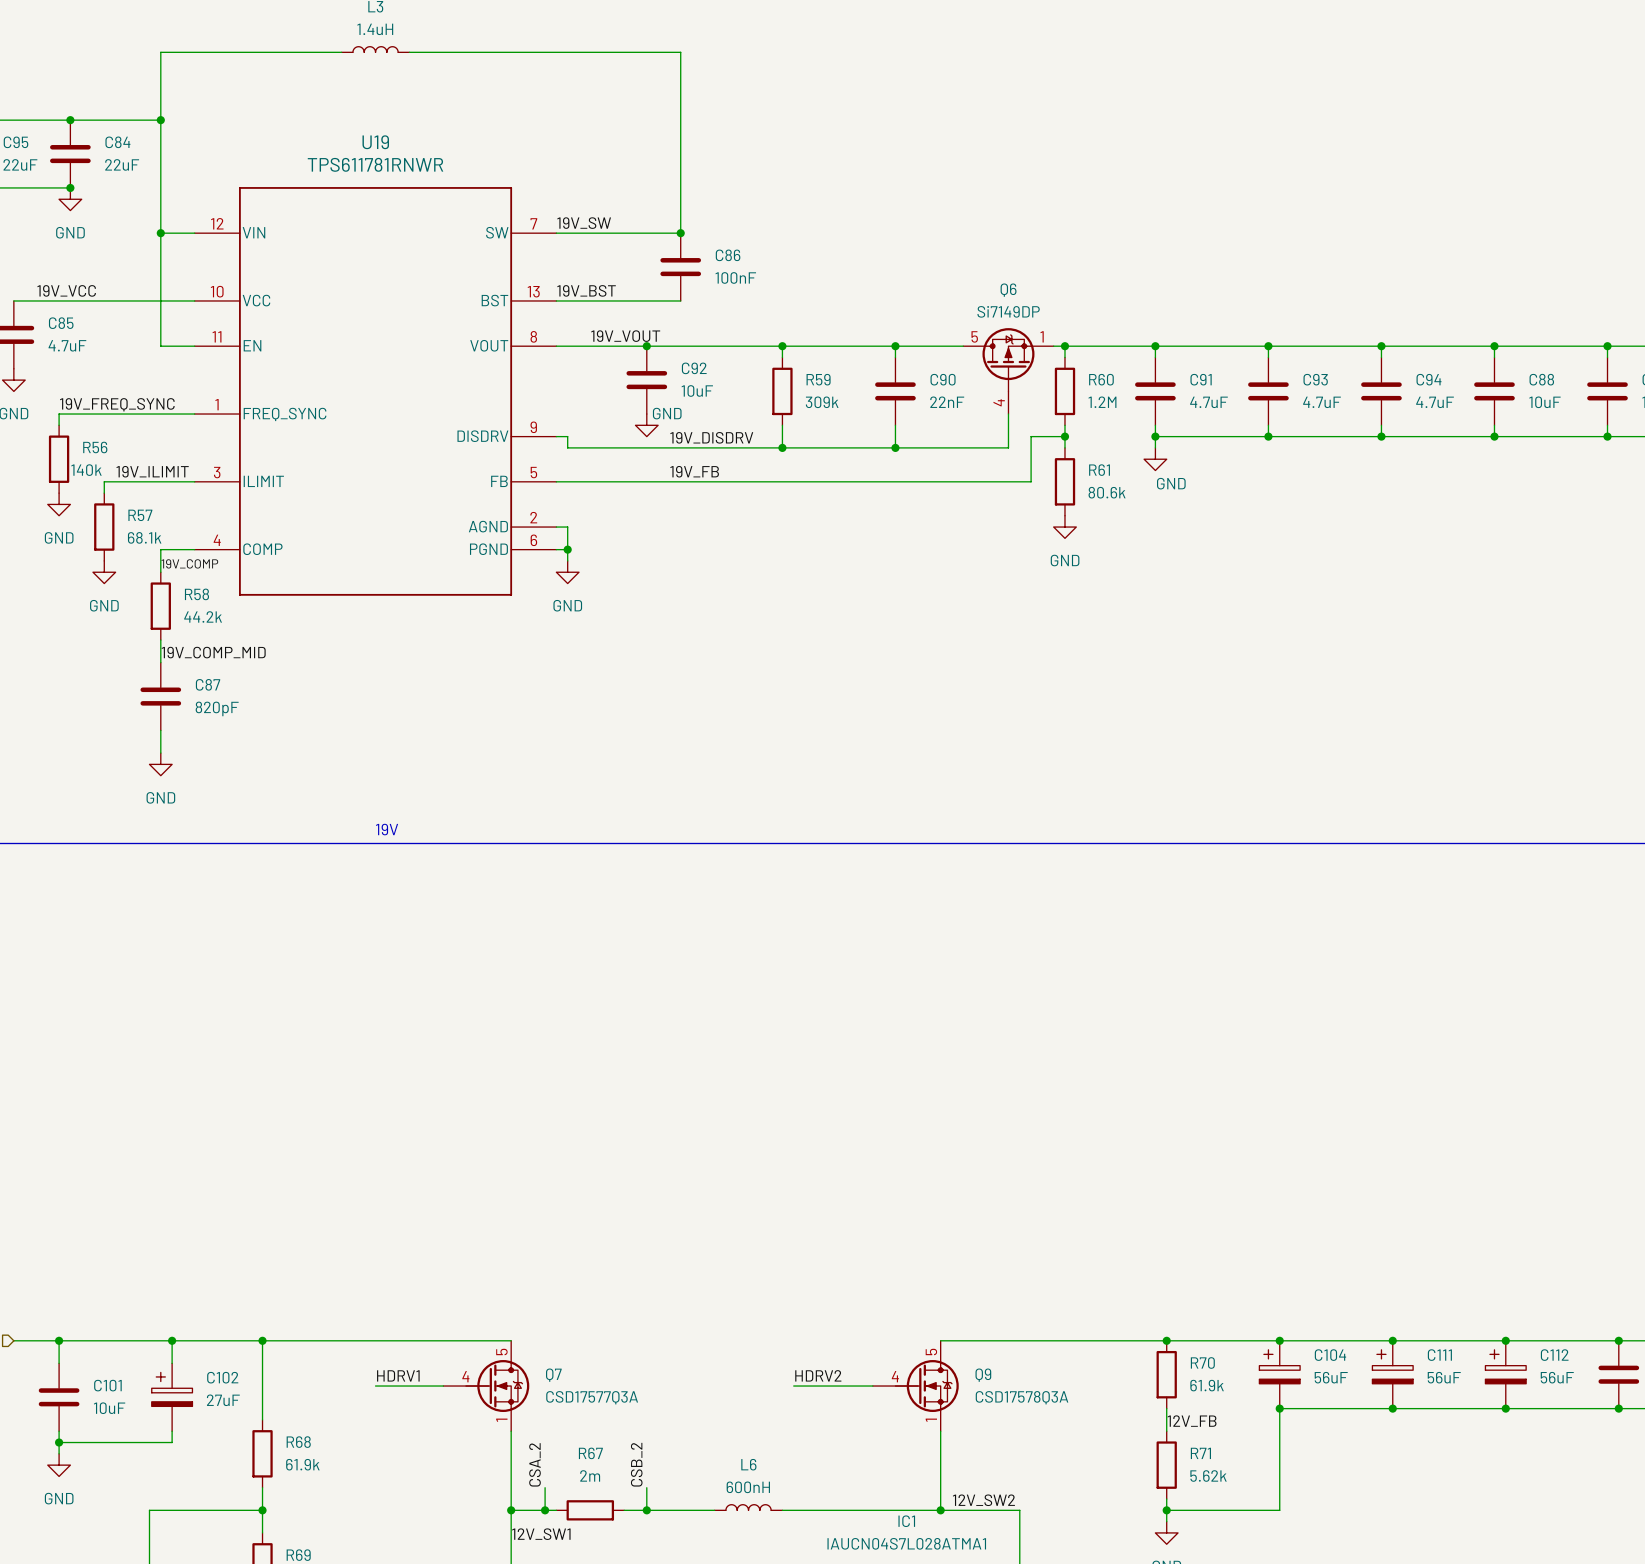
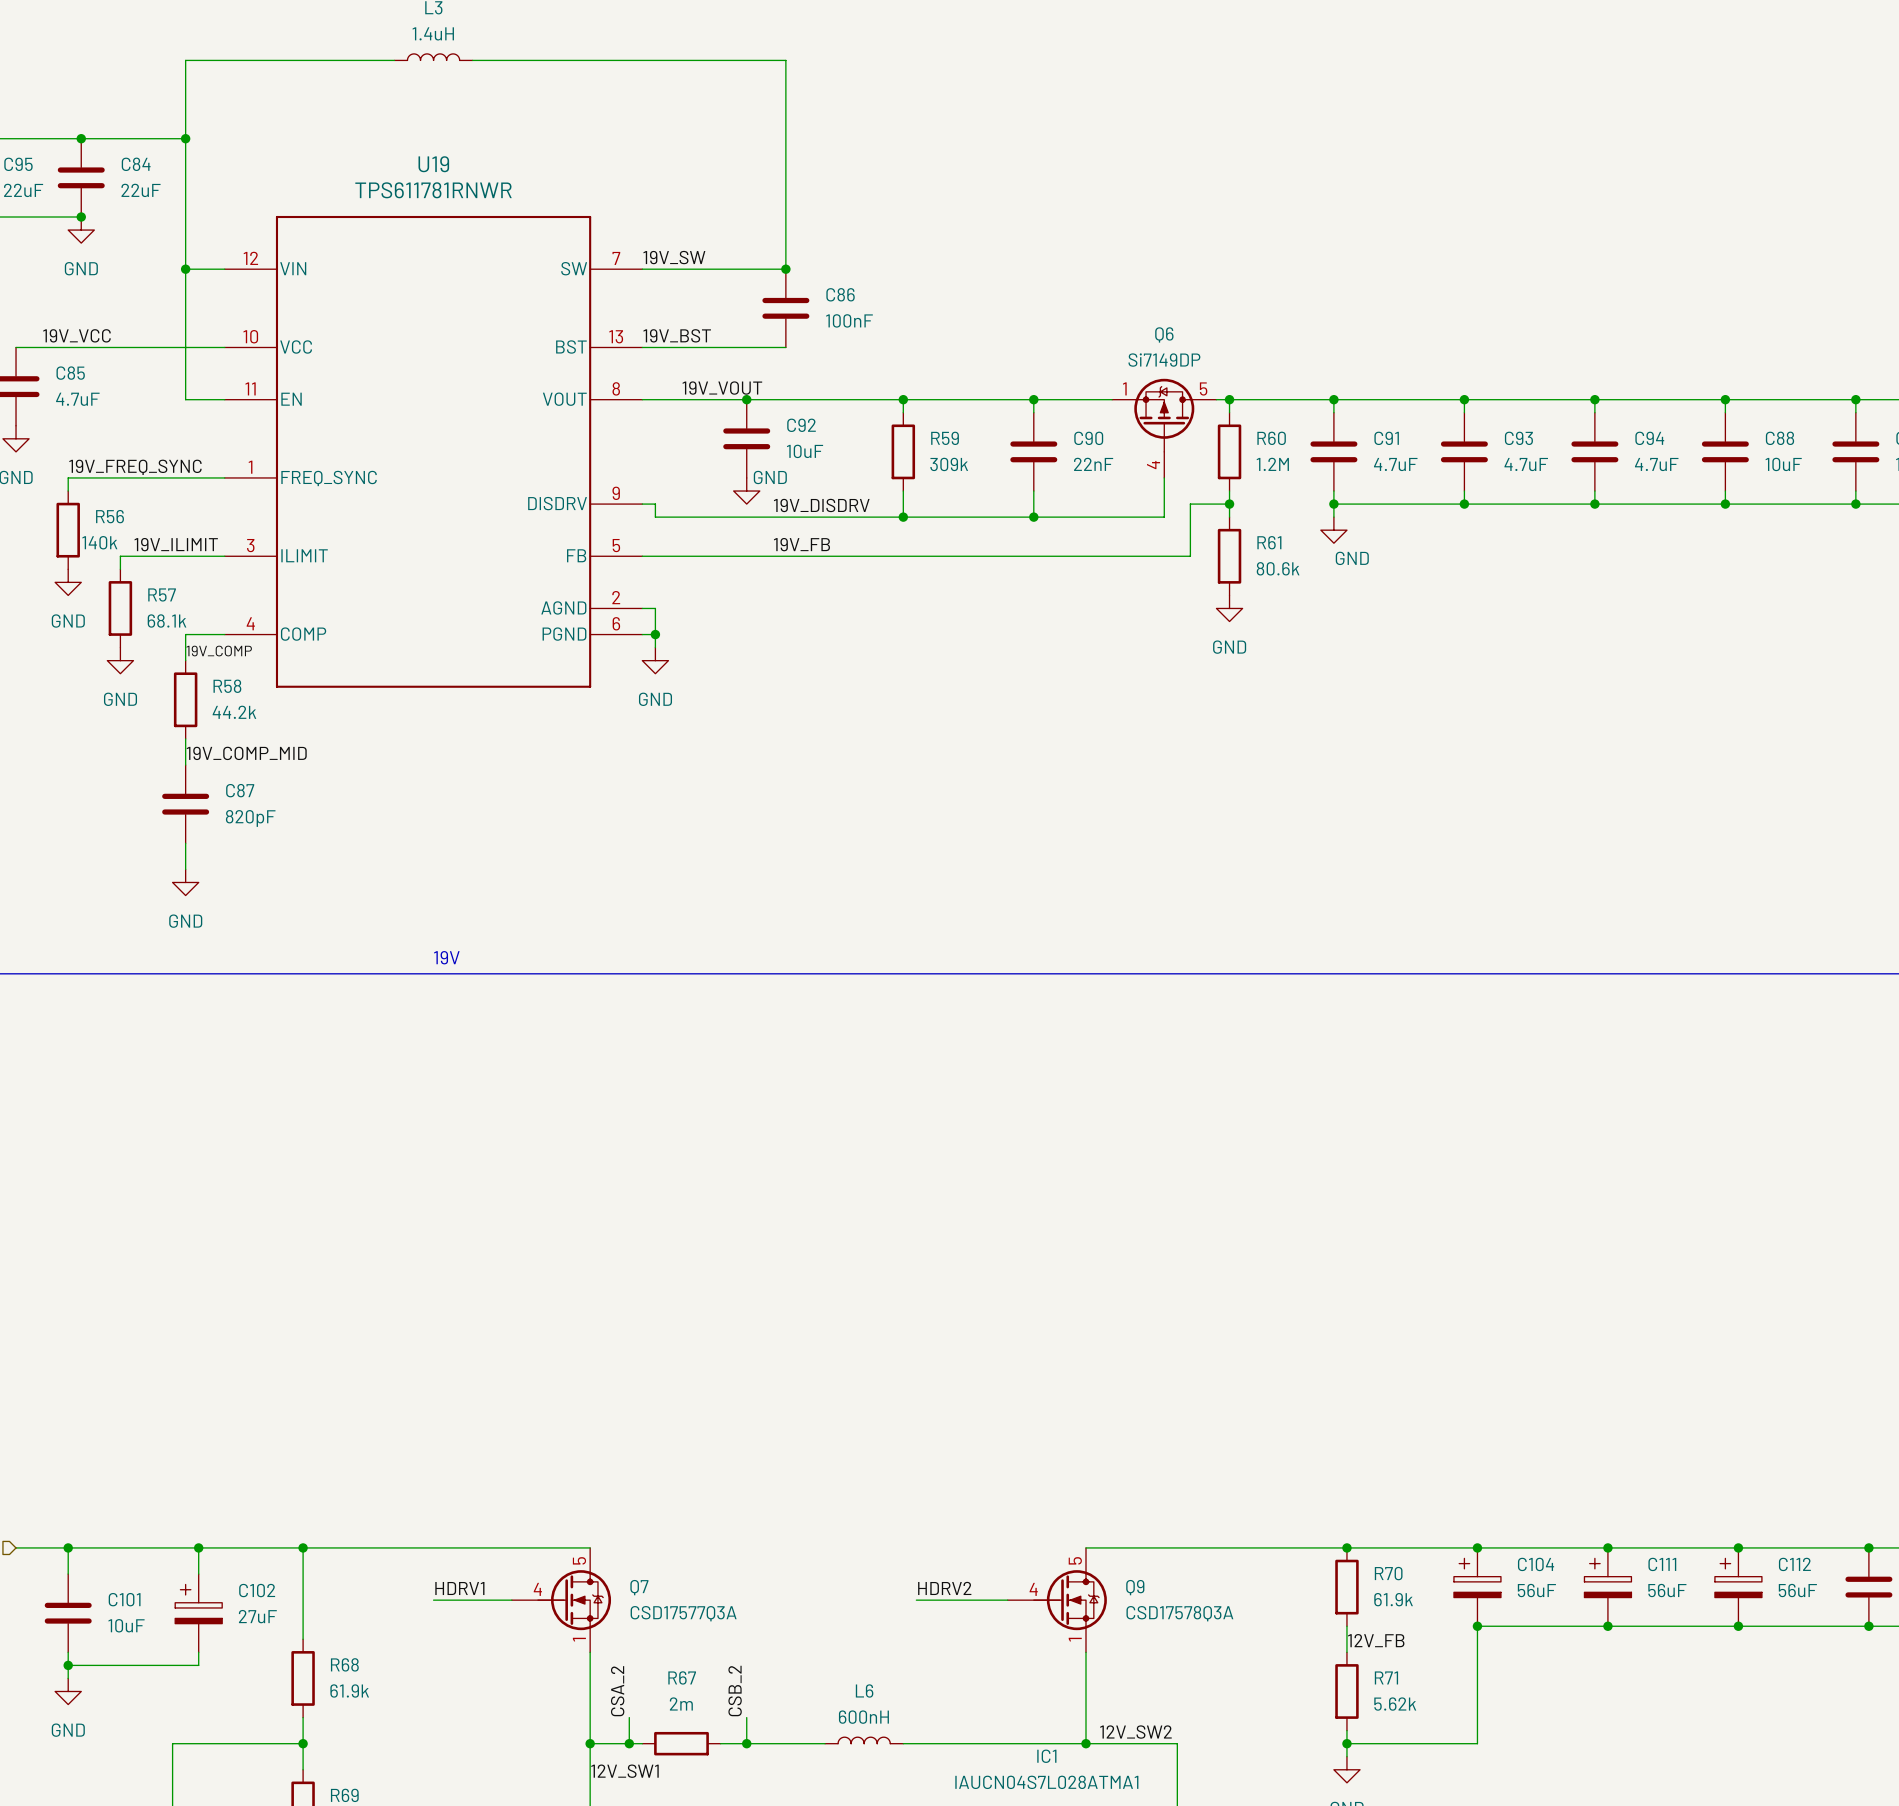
Q6 flip: as is (1008, 359) -> left-right (1164, 415)

